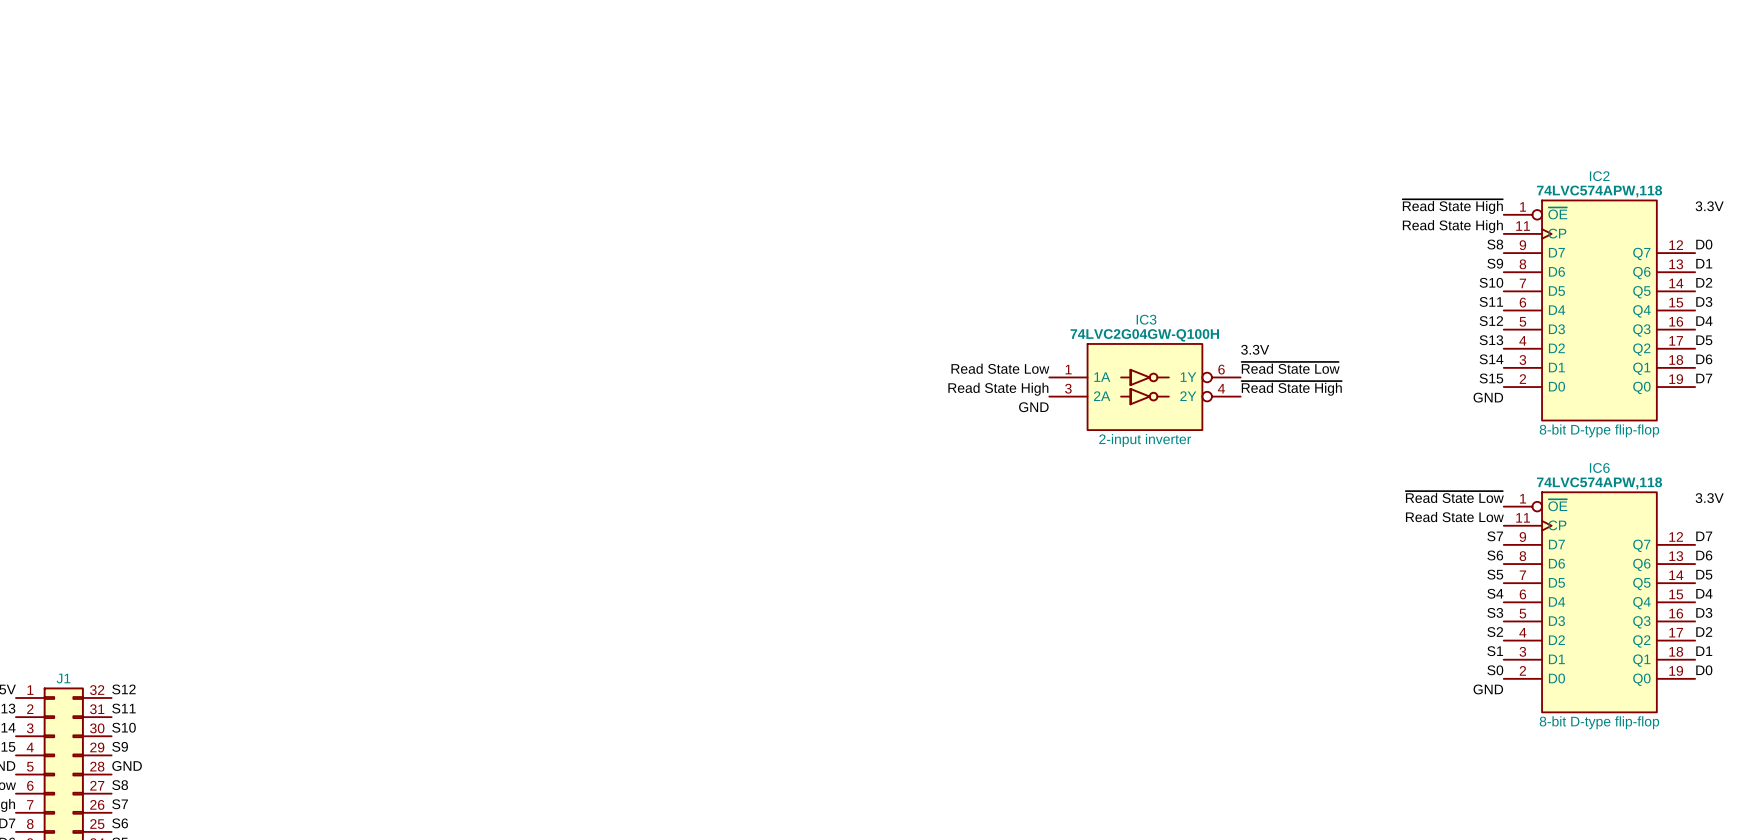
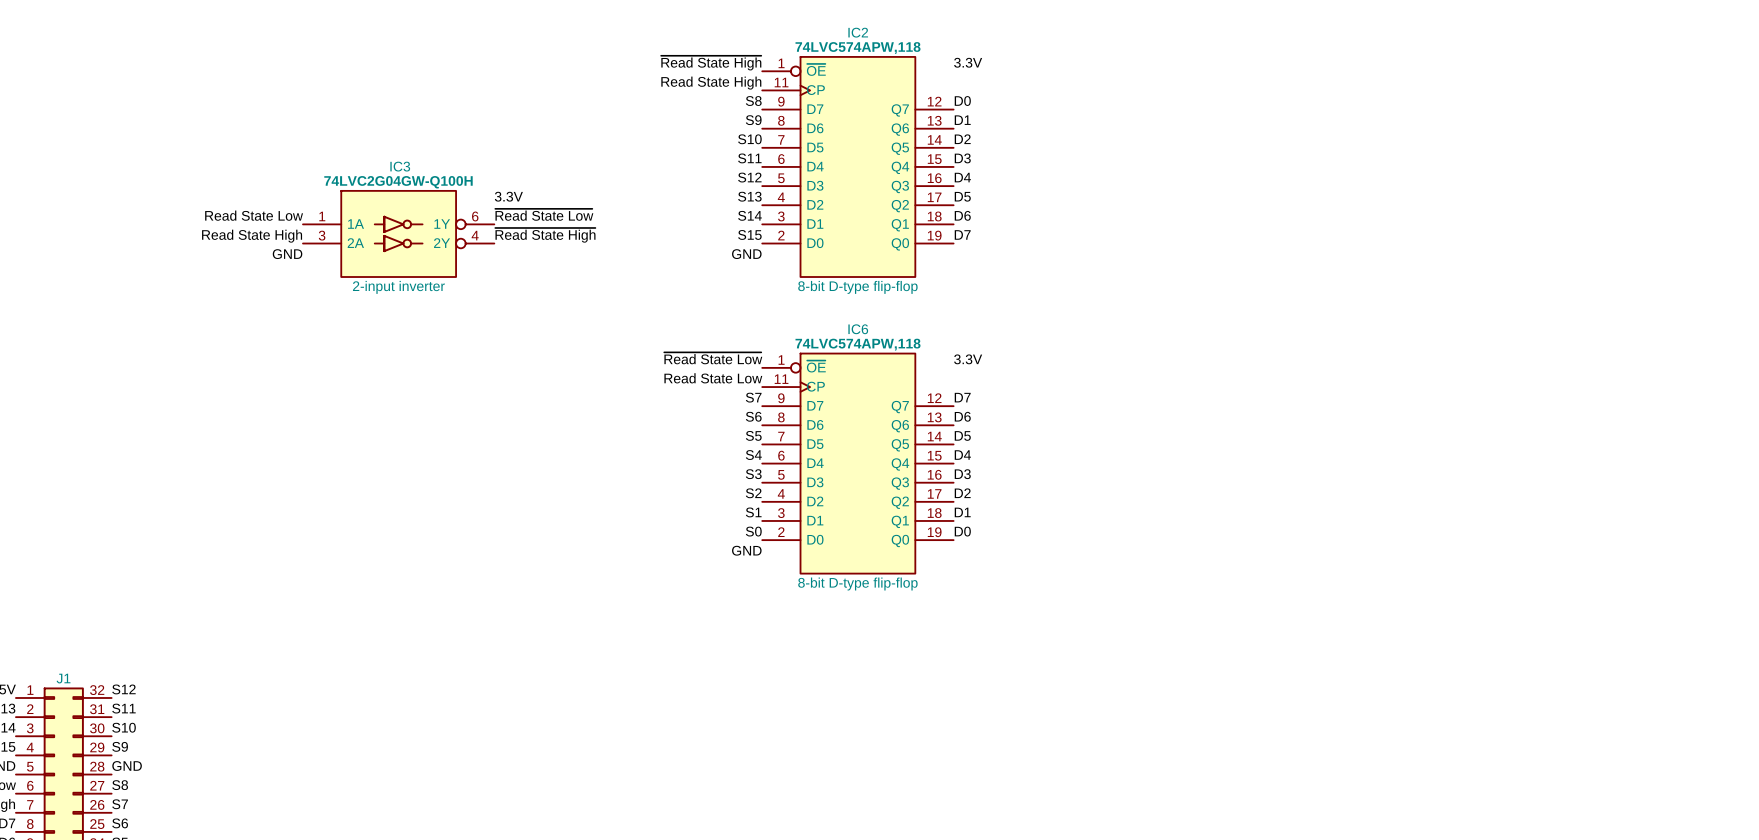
label: none -> 3.3V (968, 62)
label: none -> ~{Read State High} (711, 63)
label: none -> Read State High (711, 83)
label: none -> S8 (753, 101)
label: none -> D0 (962, 101)
label: none -> S9 (753, 120)
label: none -> D1 (962, 120)
label: none -> S10 (749, 139)
label: none -> D2 (962, 139)
label: none -> S11 (749, 158)
label: none -> D3 (962, 158)
label: none -> S12 (749, 177)
label: none -> D4 (962, 177)
label: none -> 3.3V (508, 196)
label: none -> S13 (749, 196)
label: none -> D5 (962, 196)
label: ~{Read State High} (1452, 206) -> none
label: 3.3V (1709, 206) -> none
label: none -> ~{Read State Low} (544, 214)
label: none -> Read State Low (254, 215)
label: none -> S14 (749, 215)
label: none -> D6 (962, 215)
label: Read State High (1452, 226) -> none
label: none -> S15 (749, 234)
label: none -> D7 (962, 234)
label: none -> ~{Read State High} (545, 235)
label: none -> Read State High (252, 236)
label: S8 (1495, 244) -> none
label: D0 (1704, 244) -> none
label: none -> GND (287, 254)
label: none -> GND (746, 254)
label: S9 (1495, 263) -> none
label: D1 (1704, 263) -> none
label: S10 (1491, 282) -> none
label: D2 (1704, 282) -> none
label: S11 (1491, 301) -> none
label: D3 (1704, 301) -> none
IC2 position: (1599, 310) -> (857, 166)
label: S12 (1491, 321) -> none
label: D4 (1704, 321) -> none
label: S13 (1491, 340) -> none
label: D5 (1704, 340) -> none
label: 3.3V (1255, 349) -> none
label: none -> ~{Read State Low} (713, 358)
label: none -> 3.3V (968, 359)
label: S14 (1491, 359) -> none
label: D6 (1704, 359) -> none
label: ~{Read State Low} (1290, 367) -> none
label: Read State Low (1000, 368) -> none
label: none -> Read State Low (713, 378)
label: S15 (1491, 378) -> none
label: D7 (1704, 378) -> none
IC3 position: (1144, 387) -> (398, 233)
label: ~{Read State High} (1291, 388) -> none
label: Read State High (998, 389) -> none
label: none -> S7 (753, 397)
label: none -> D7 (962, 397)
label: GND (1488, 397) -> none
label: GND (1033, 407) -> none
label: none -> S6 (753, 416)
label: none -> D6 (962, 416)
label: none -> S5 (753, 435)
label: none -> D5 (962, 435)
label: none -> S4 (753, 455)
label: none -> D4 (962, 455)
label: none -> S3 (753, 474)
label: none -> D3 (962, 474)
label: none -> S2 (753, 493)
label: none -> D2 (962, 493)
label: ~{Read State Low} (1454, 497) -> none
label: 3.3V (1709, 498) -> none
label: none -> S1 (753, 512)
label: none -> D1 (962, 512)
label: Read State Low (1454, 517) -> none
label: none -> S0 (753, 531)
label: none -> D0 (962, 531)
label: S7 (1495, 536) -> none
label: D7 (1704, 536) -> none
label: none -> GND (746, 550)
label: S6 (1495, 555) -> none
label: D6 (1704, 555) -> none
label: S5 (1495, 574) -> none
label: D5 (1704, 574) -> none
label: S4 (1495, 593) -> none
label: D4 (1704, 593) -> none
IC6 position: (1599, 602) -> (857, 463)
label: S3 (1495, 612) -> none
label: D3 (1704, 612) -> none
label: D2 (1704, 631) -> none
label: S2 (1495, 632) -> none
label: S1 (1495, 651) -> none
label: D1 (1704, 651) -> none
label: S0 (1495, 670) -> none
label: D0 (1704, 670) -> none
label: GND (1488, 689) -> none

